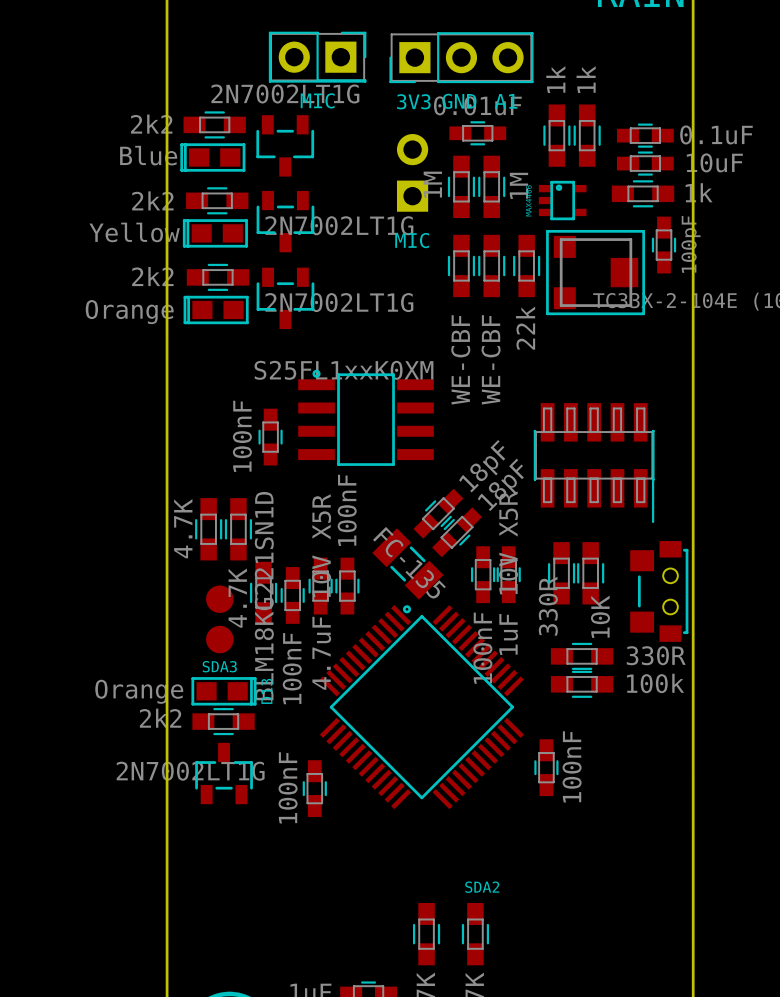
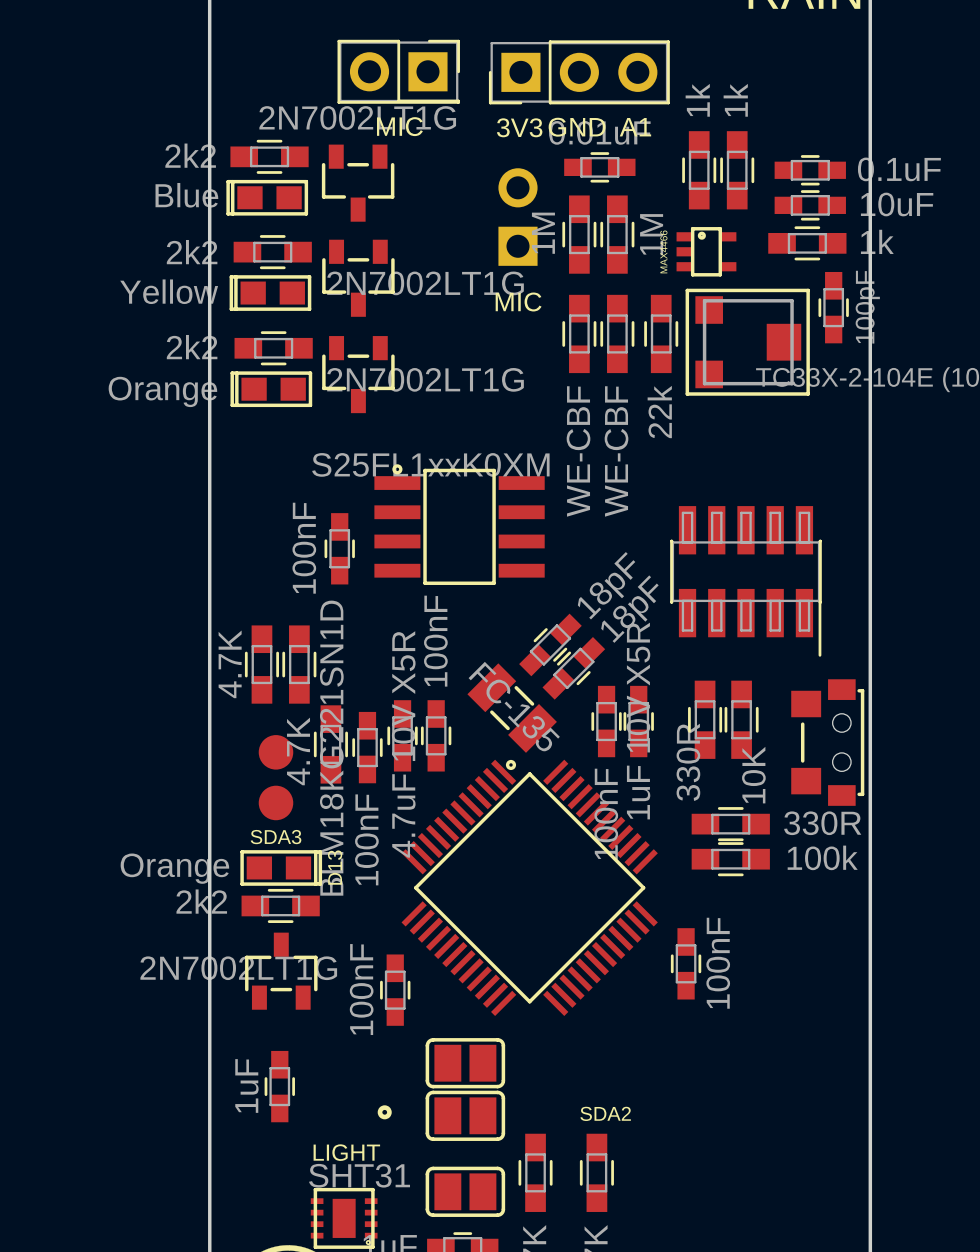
part: none -> (465, 1063)
part: none -> 1uF (279, 1086)
drawing: none -> [377, 1105, 392, 1120]
part: none -> (465, 1115)
text: none -> LIGHT (346, 1152)
part: none -> (465, 1191)
part: none -> SHT31 (344, 1218)

